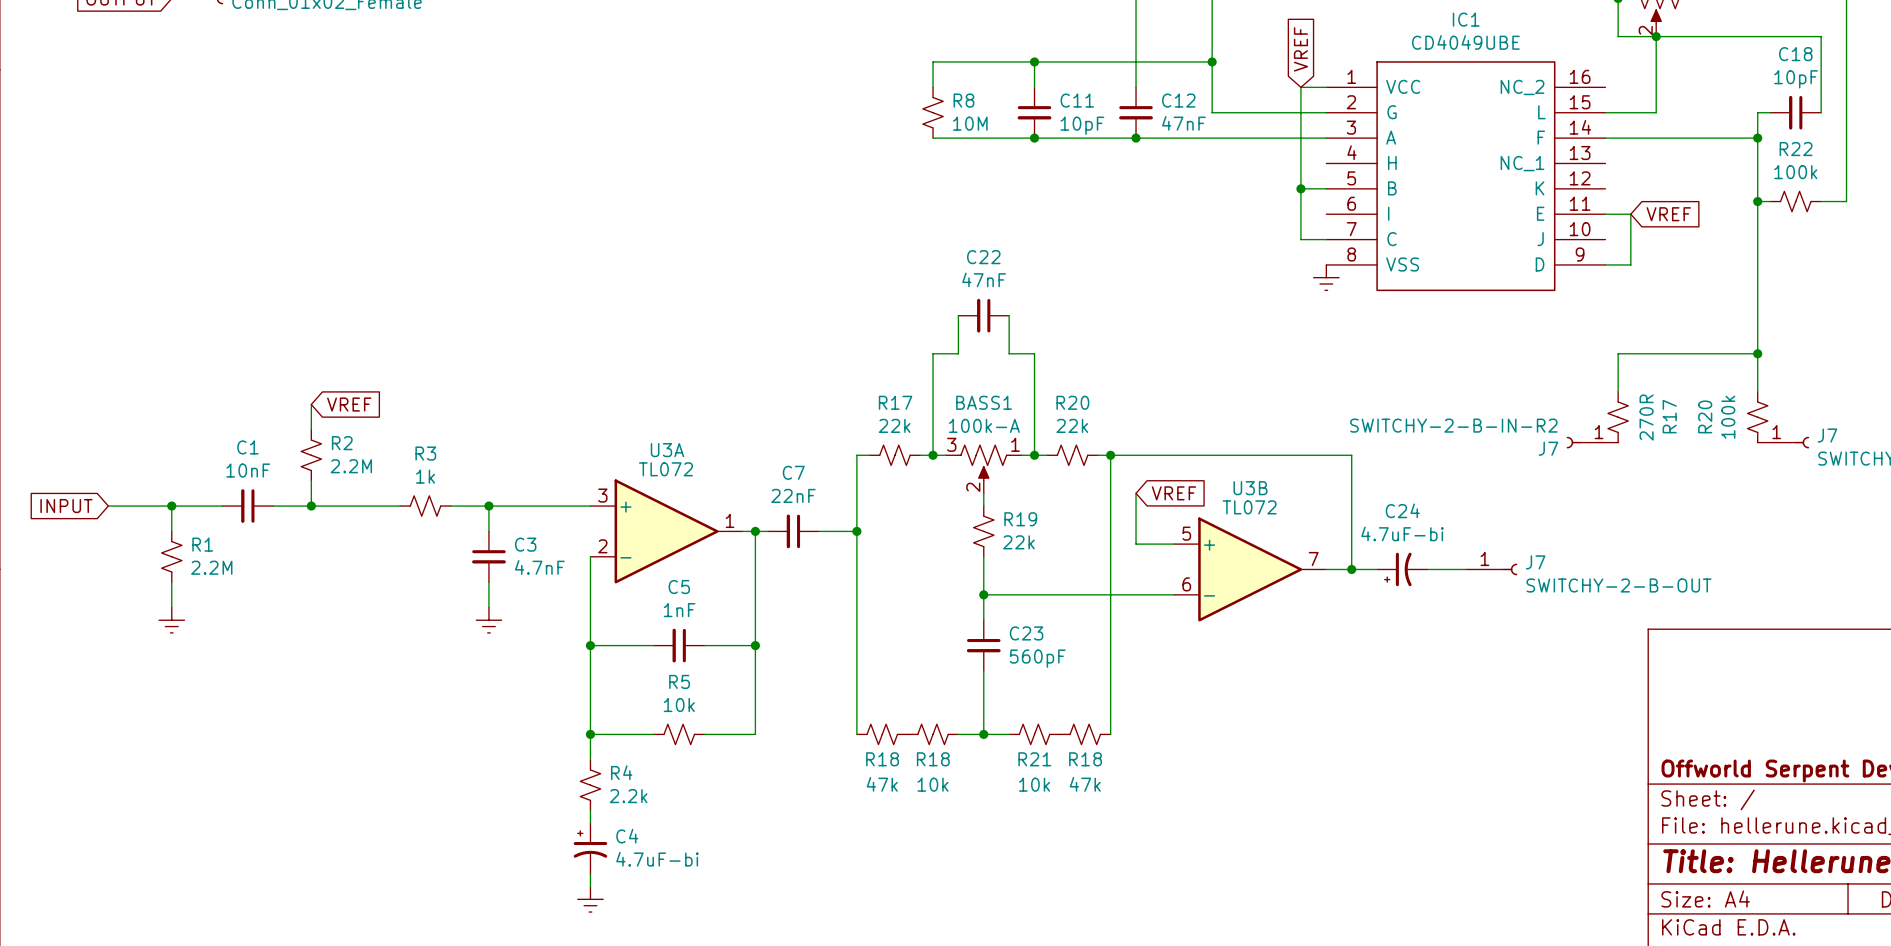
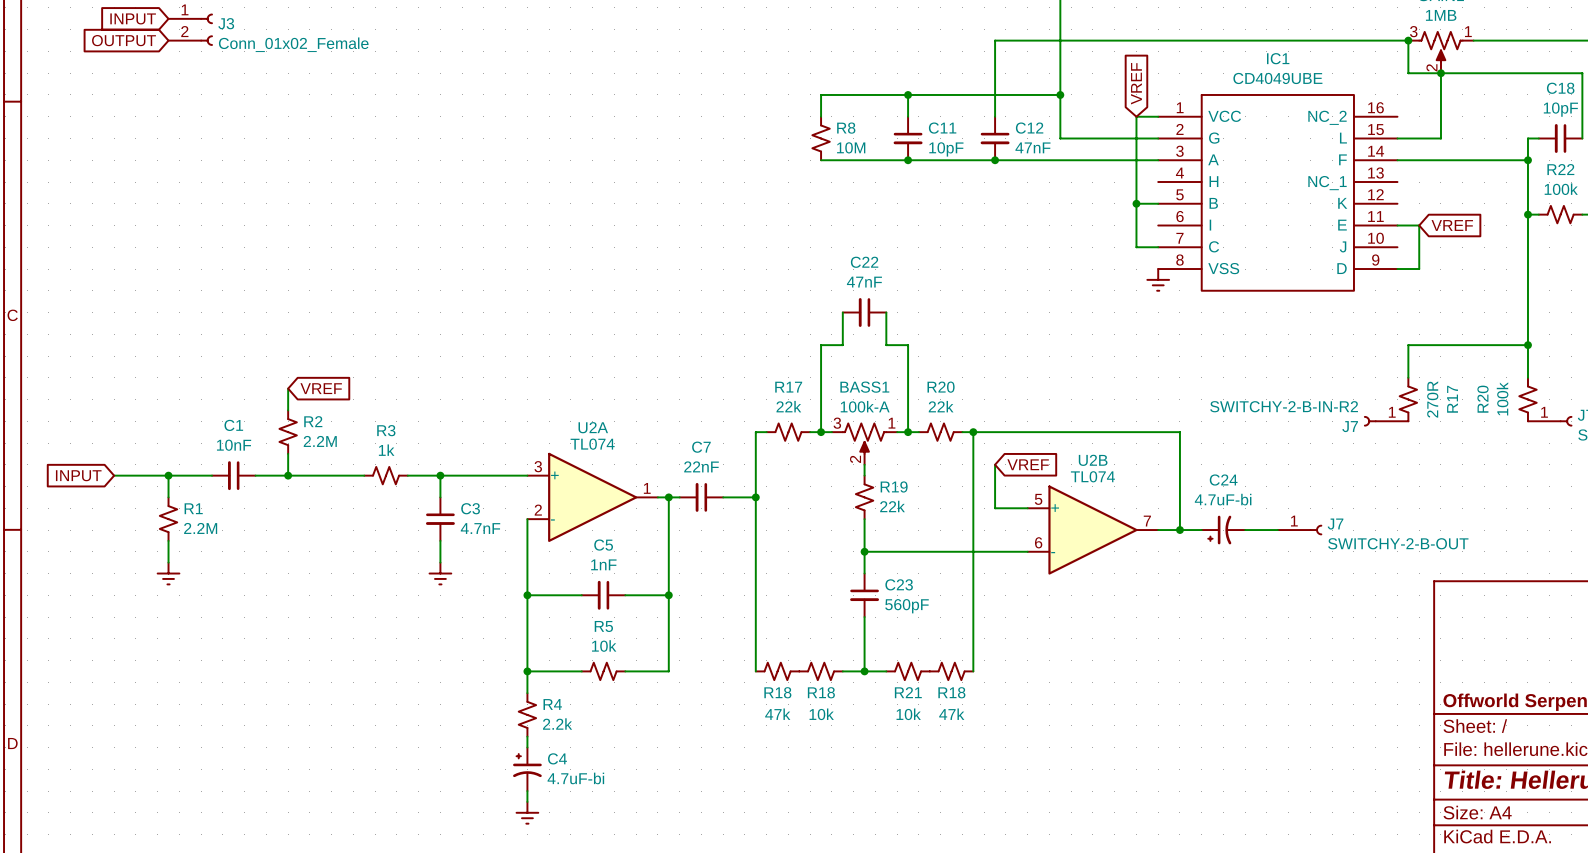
U3A name: U3A (667, 450) -> U2A (593, 427)
U3A value: TL072 (665, 469) -> TL074 (592, 444)
U3B name: U3B (1250, 488) -> U2B (1093, 460)
U3B value: TL072 (1249, 507) -> TL074 (1092, 476)

